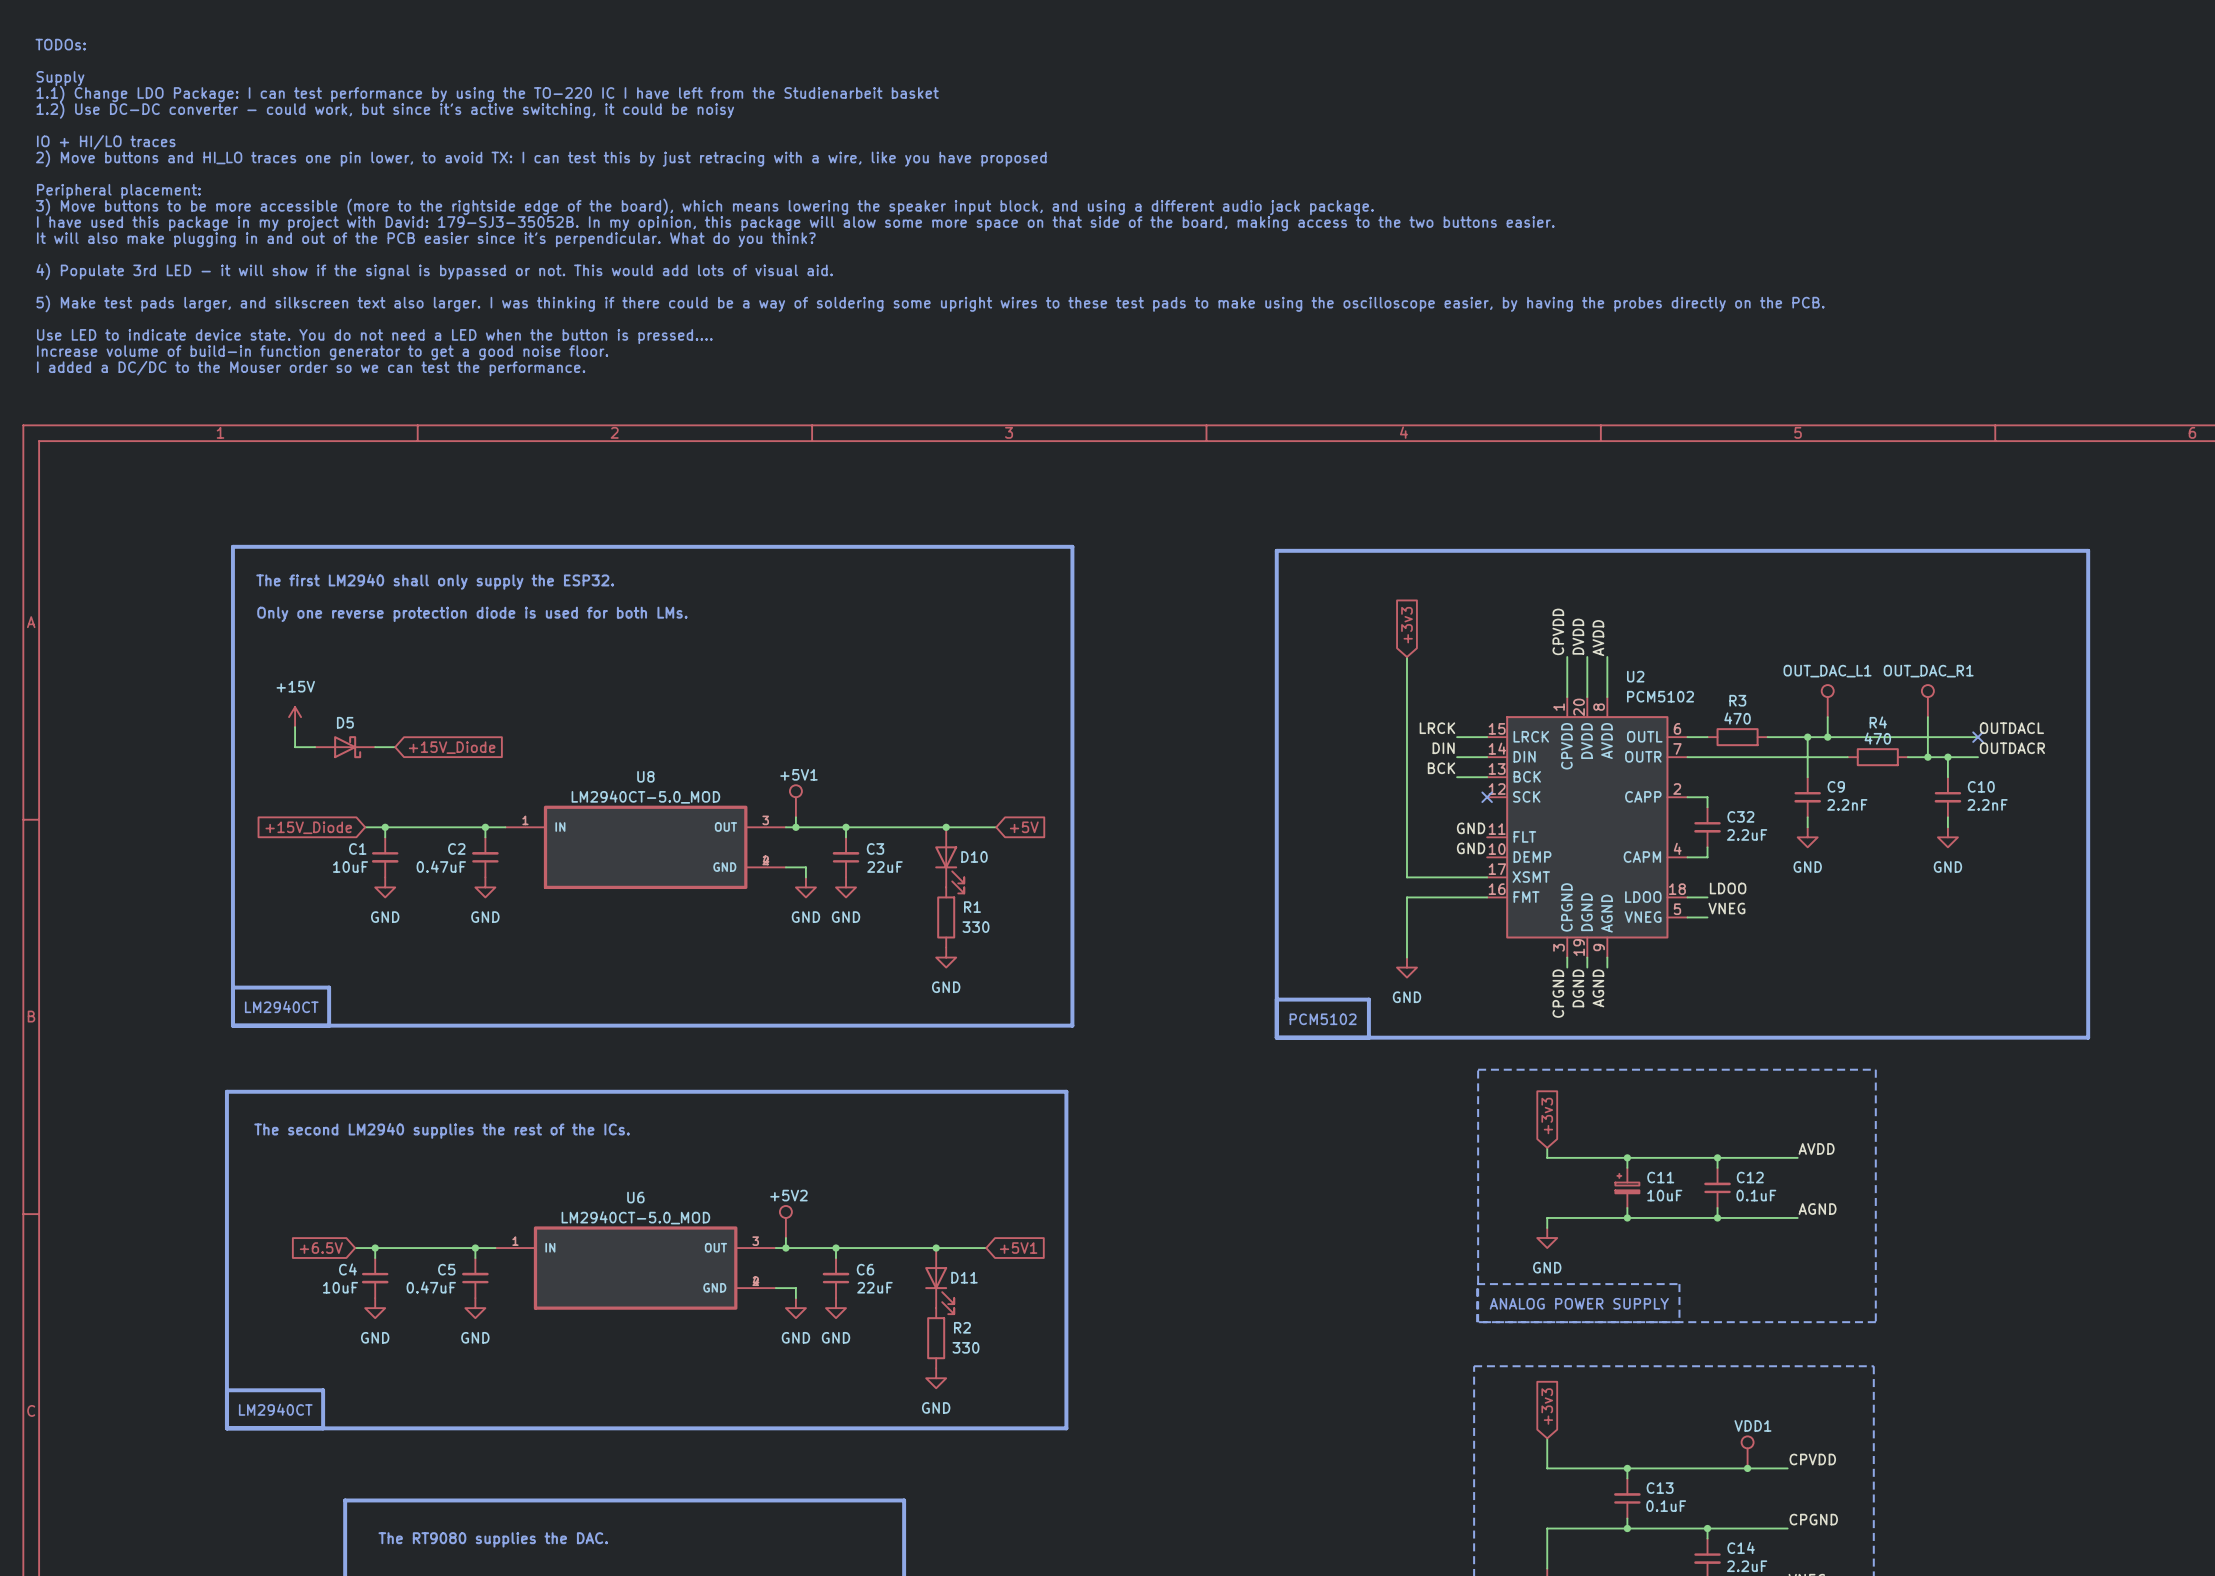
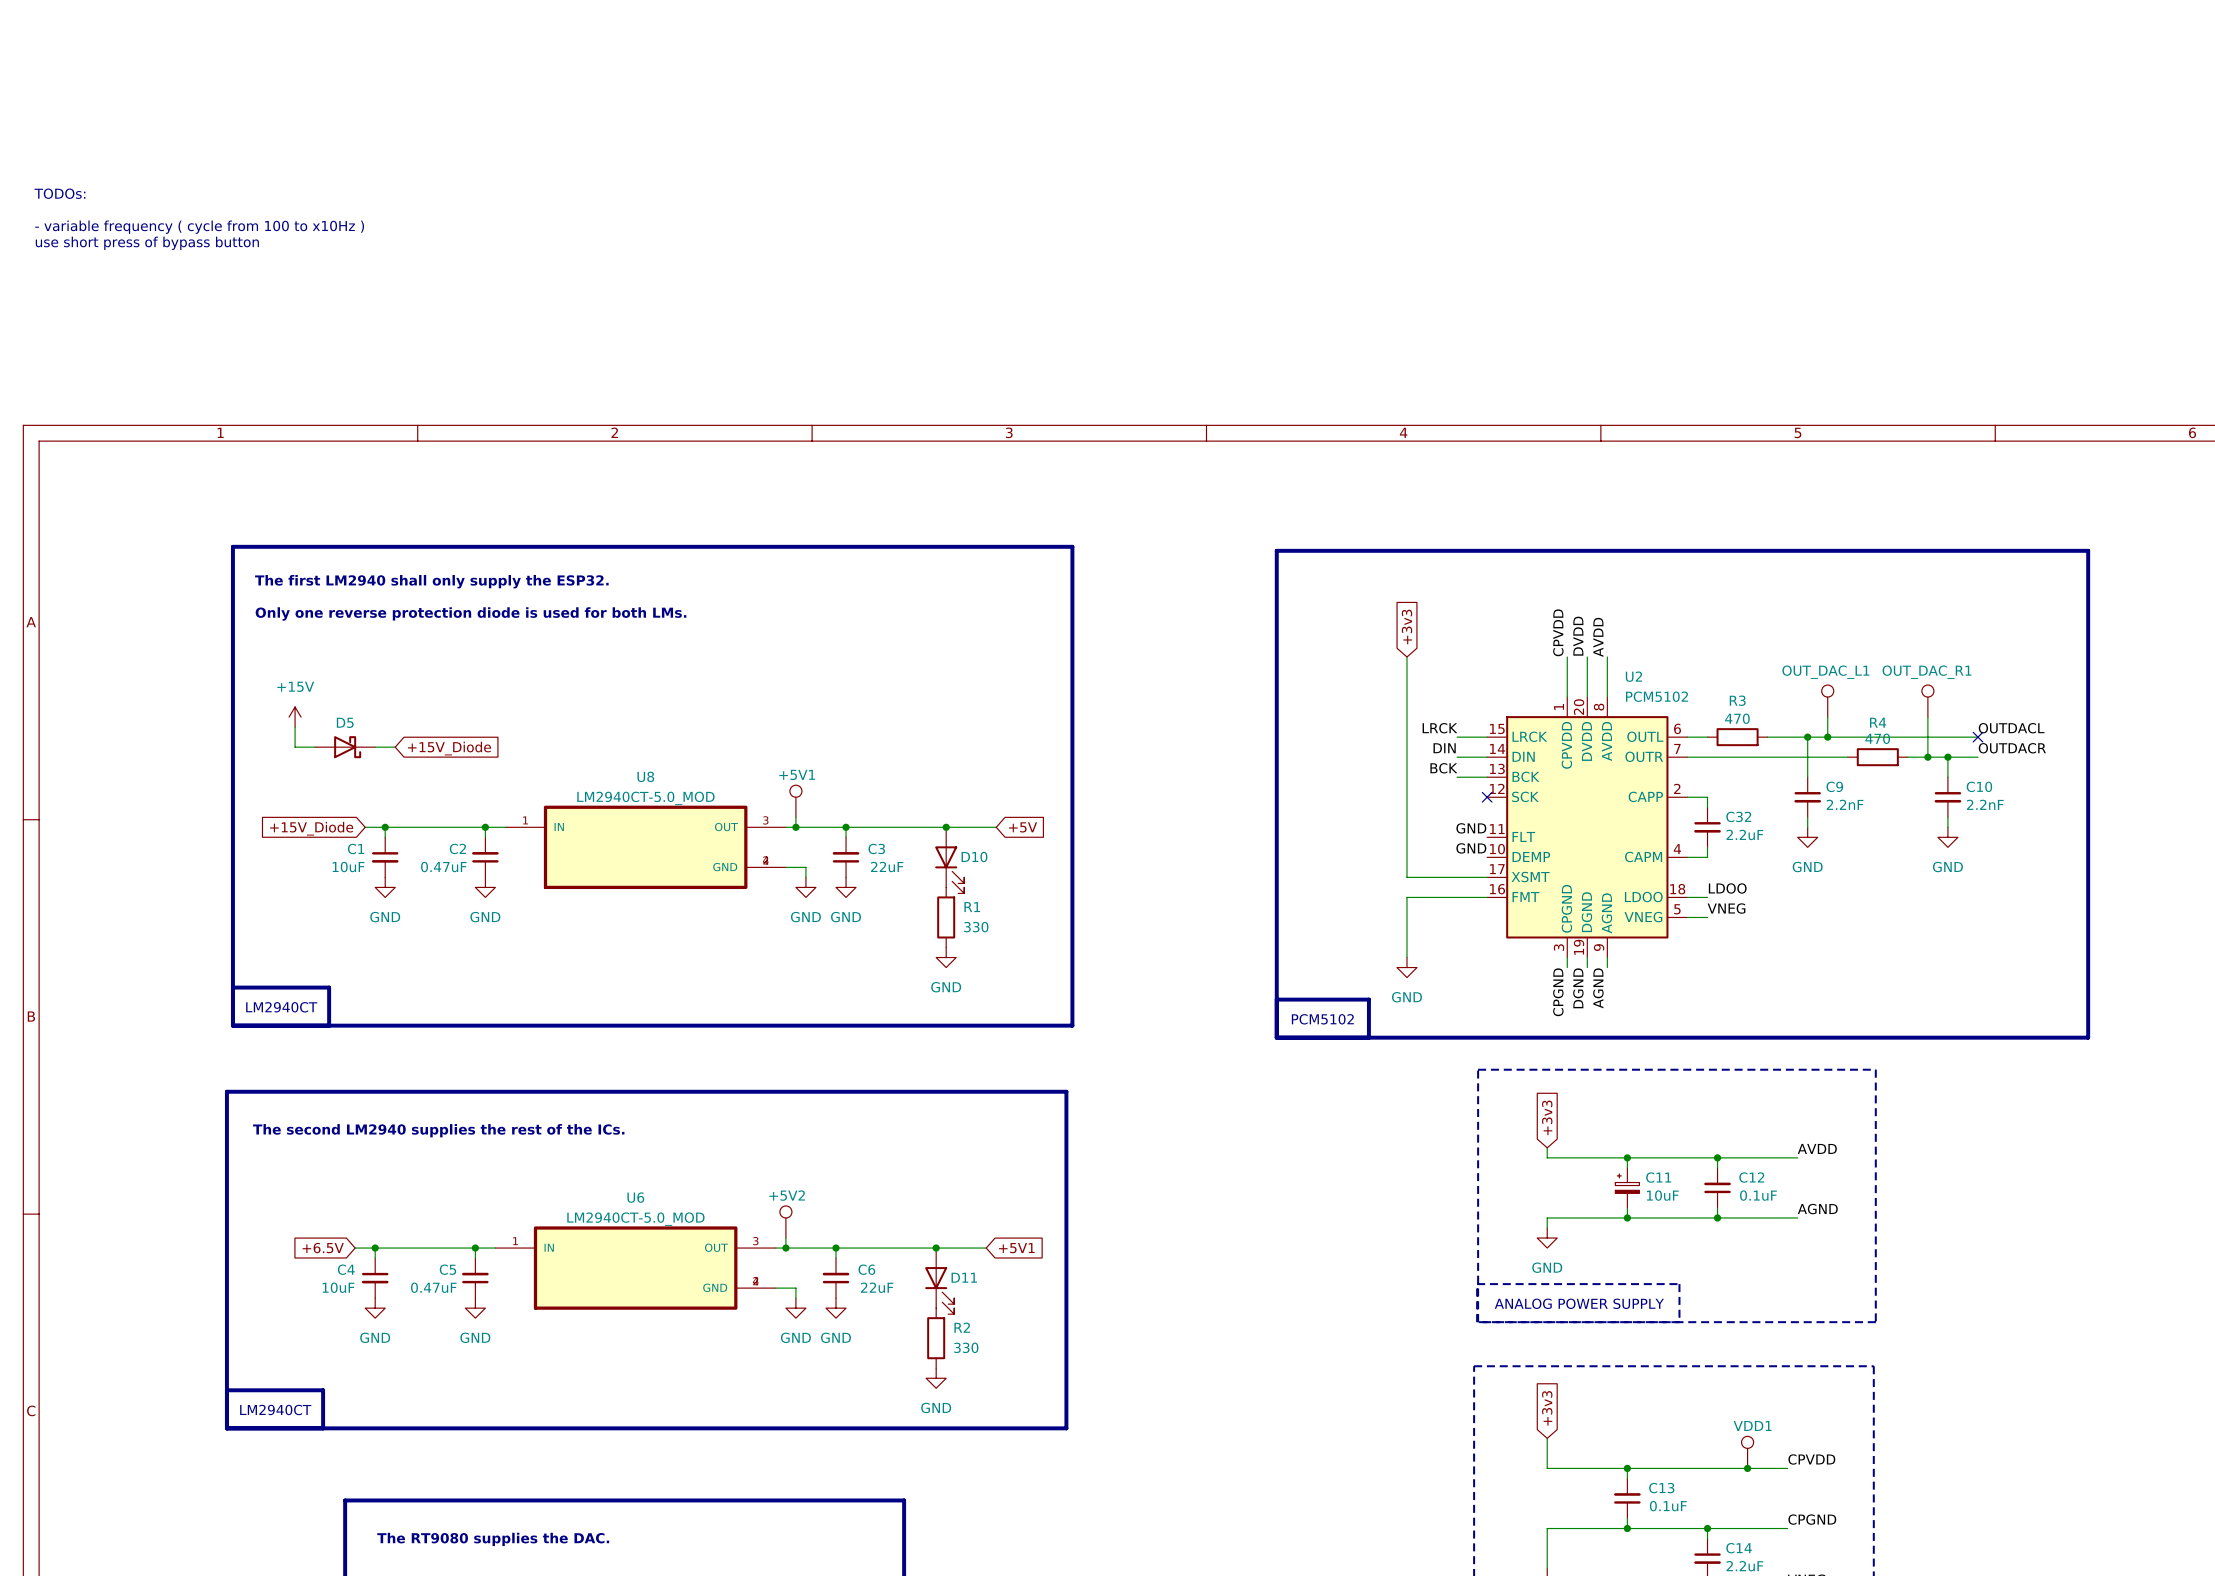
text position: TODOs: (60, 44) -> TODOs: (59, 193)
text: Supply (60, 78) -> none
text: 1.1) Change LDO Package: I can test performance by using the TO-220 IC I have left from the Studienarbeit basket (487, 94) -> none
text: 1.2) Use DC-DC converter - could work, but since it's active switching, it could be noisy (385, 110) -> none
text: IO + HI/LO traces (106, 142) -> none
text: 2) Move buttons and HI_LO traces one pin lower, to avoid TX: I can test this by just retracing with a wire, like you have proposed (541, 158) -> none
text: Peripheral placement: (118, 191) -> none
text: 3) Move buttons to be more accessible (more to the rightside edge of the board), which means lowering the speaker input block, and using a different audio jack package. (704, 207) -> none
text: I have used this package in my project with David: 179-SJ3-35052B. In my opinion, this package will alow some more space on that side of the board, making access to the two buttons easier. (795, 223) -> - variable frequency ( cycle from 100 to x10Hz ) (199, 227)
text: It will also make plugging in and out of the PCB easier since it's perpendicular. What do you think? (426, 239) -> use short press of bypass button (147, 243)
text: 4) Populate 3rd LED - it will show if the signal is bypassed or not. This would add lots of visual aid. (434, 271) -> none
text: 5) Make test pads larger, and silkscreen text also larger. I was thinking if there could be a way of soldering some upright wires to these test pads to make using the oscilloscope easier, by having the probes directly on the PCB. (930, 303) -> none
text: Use LED to indicate device state. You do not need a LED when the button is pressed.... (374, 336) -> none
text: Increase volume of build-in function generator to get a good noise floor. (322, 352) -> none
text: I added a DC/DC to the Mouser order so we can test the performance. (311, 368) -> none

